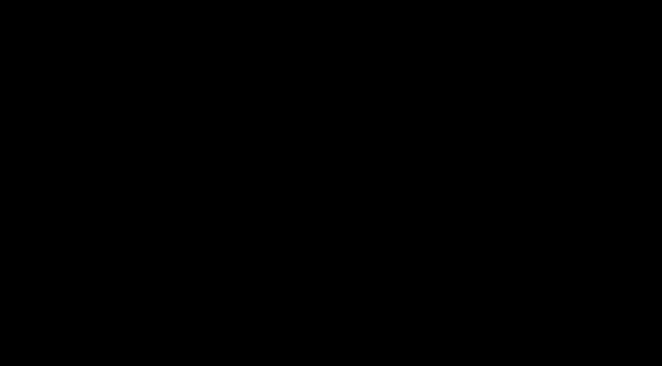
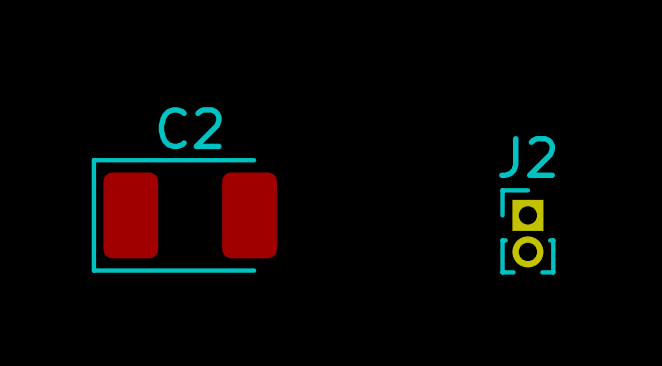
C2: none -> (184, 215)
J2: none -> (527, 231)

